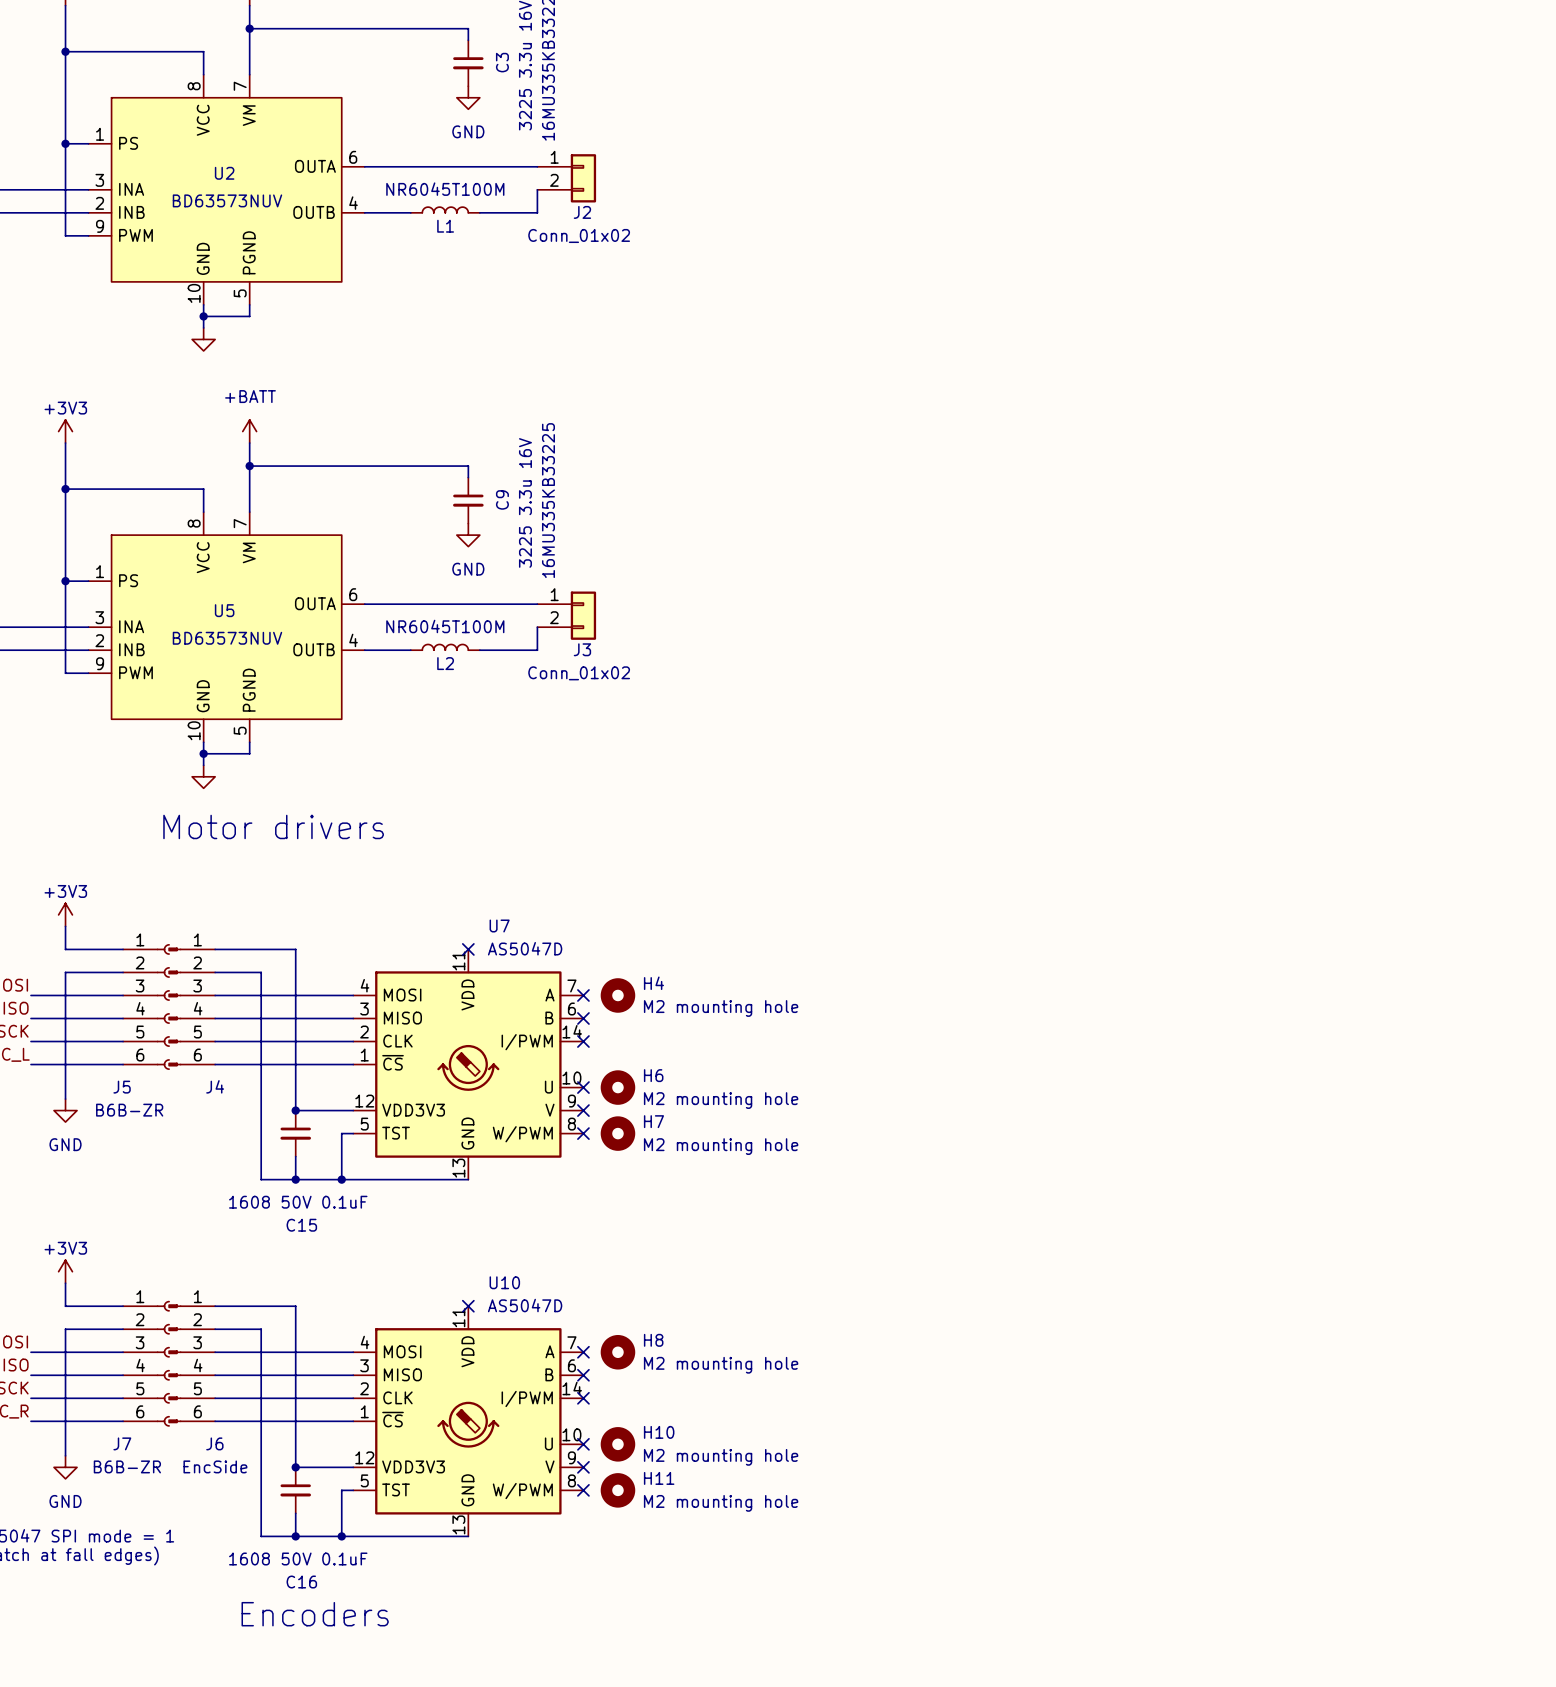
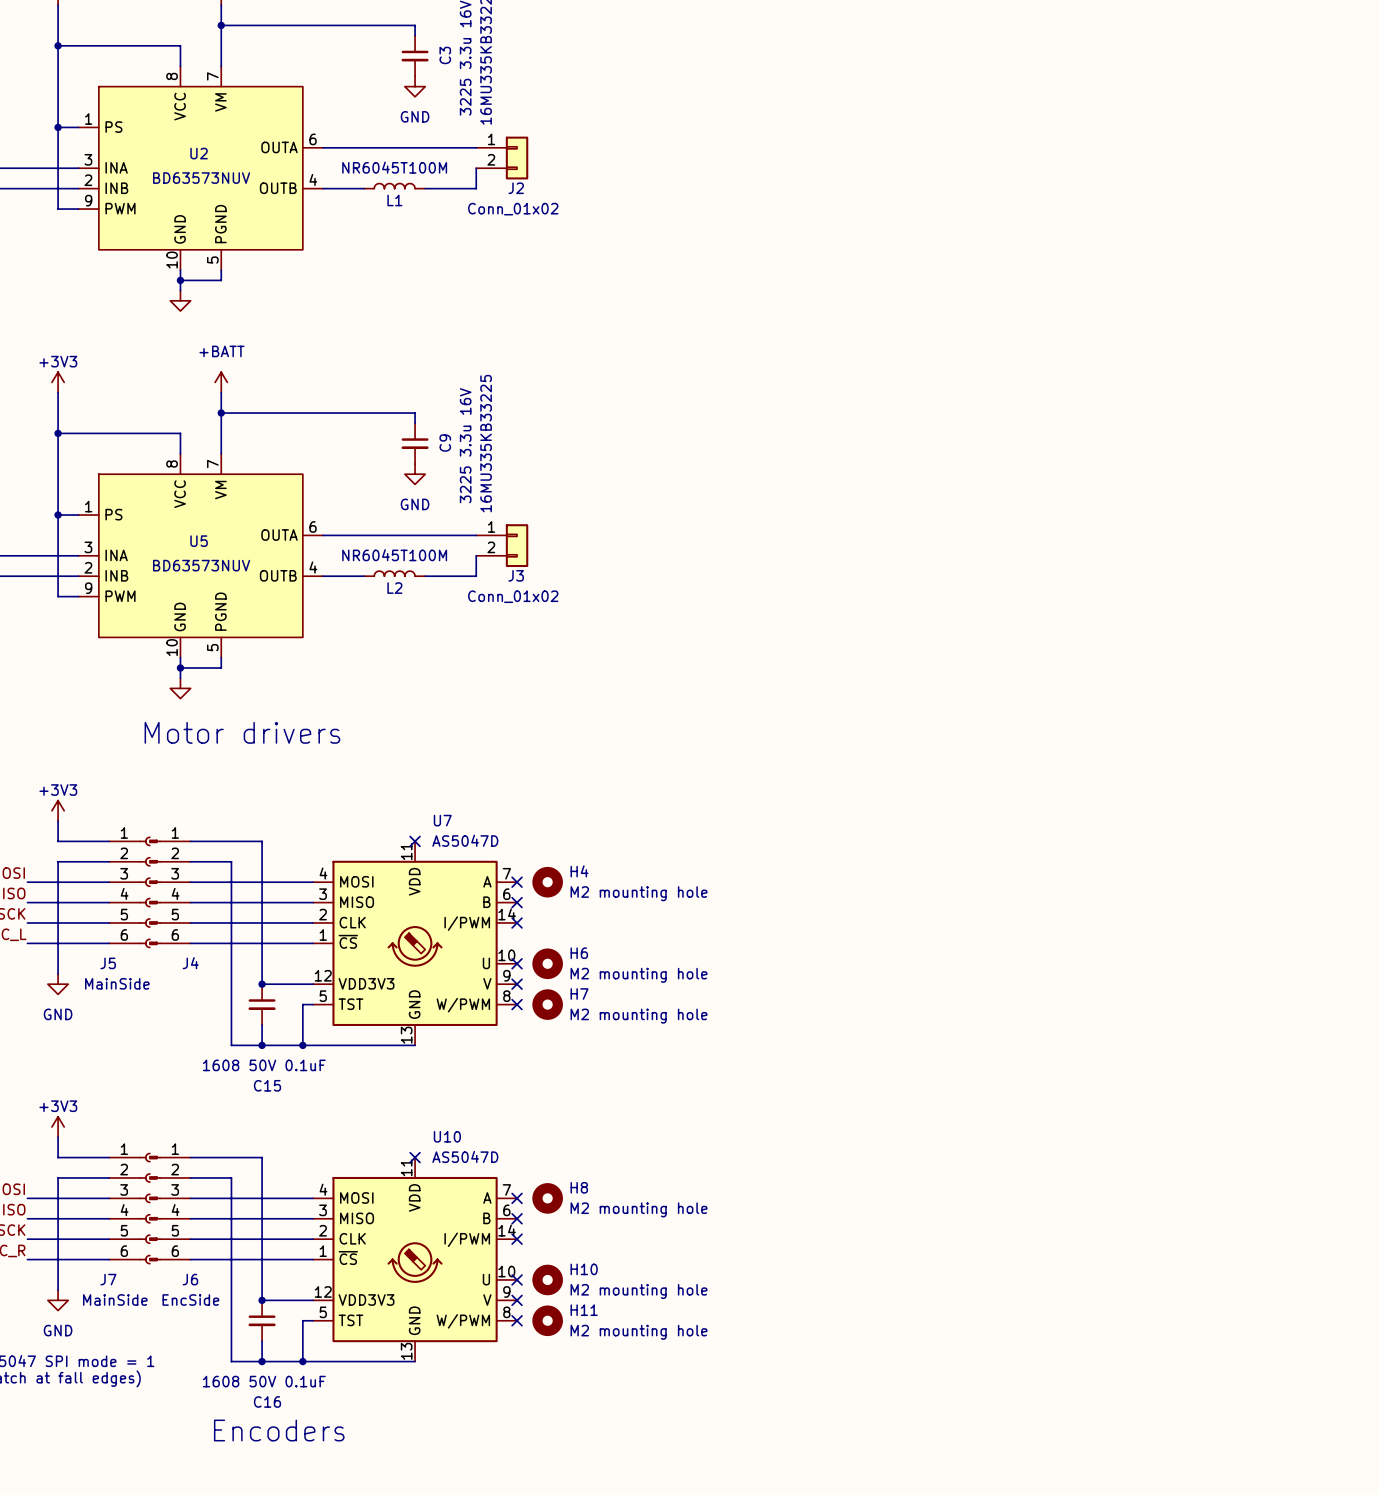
J5 value: B6B-ZR (129, 1110) -> MainSide (117, 983)
J7 value: B6B-ZR (127, 1466) -> MainSide (115, 1299)

